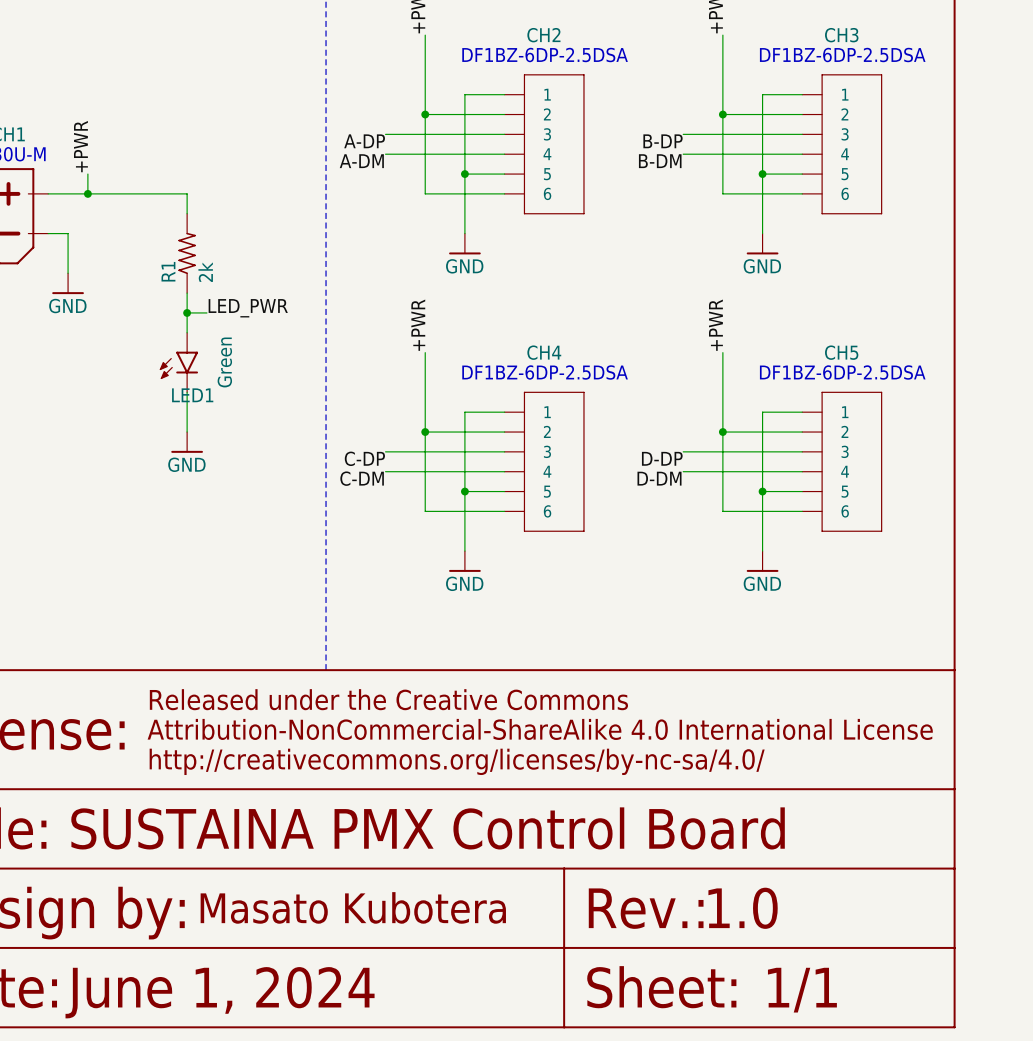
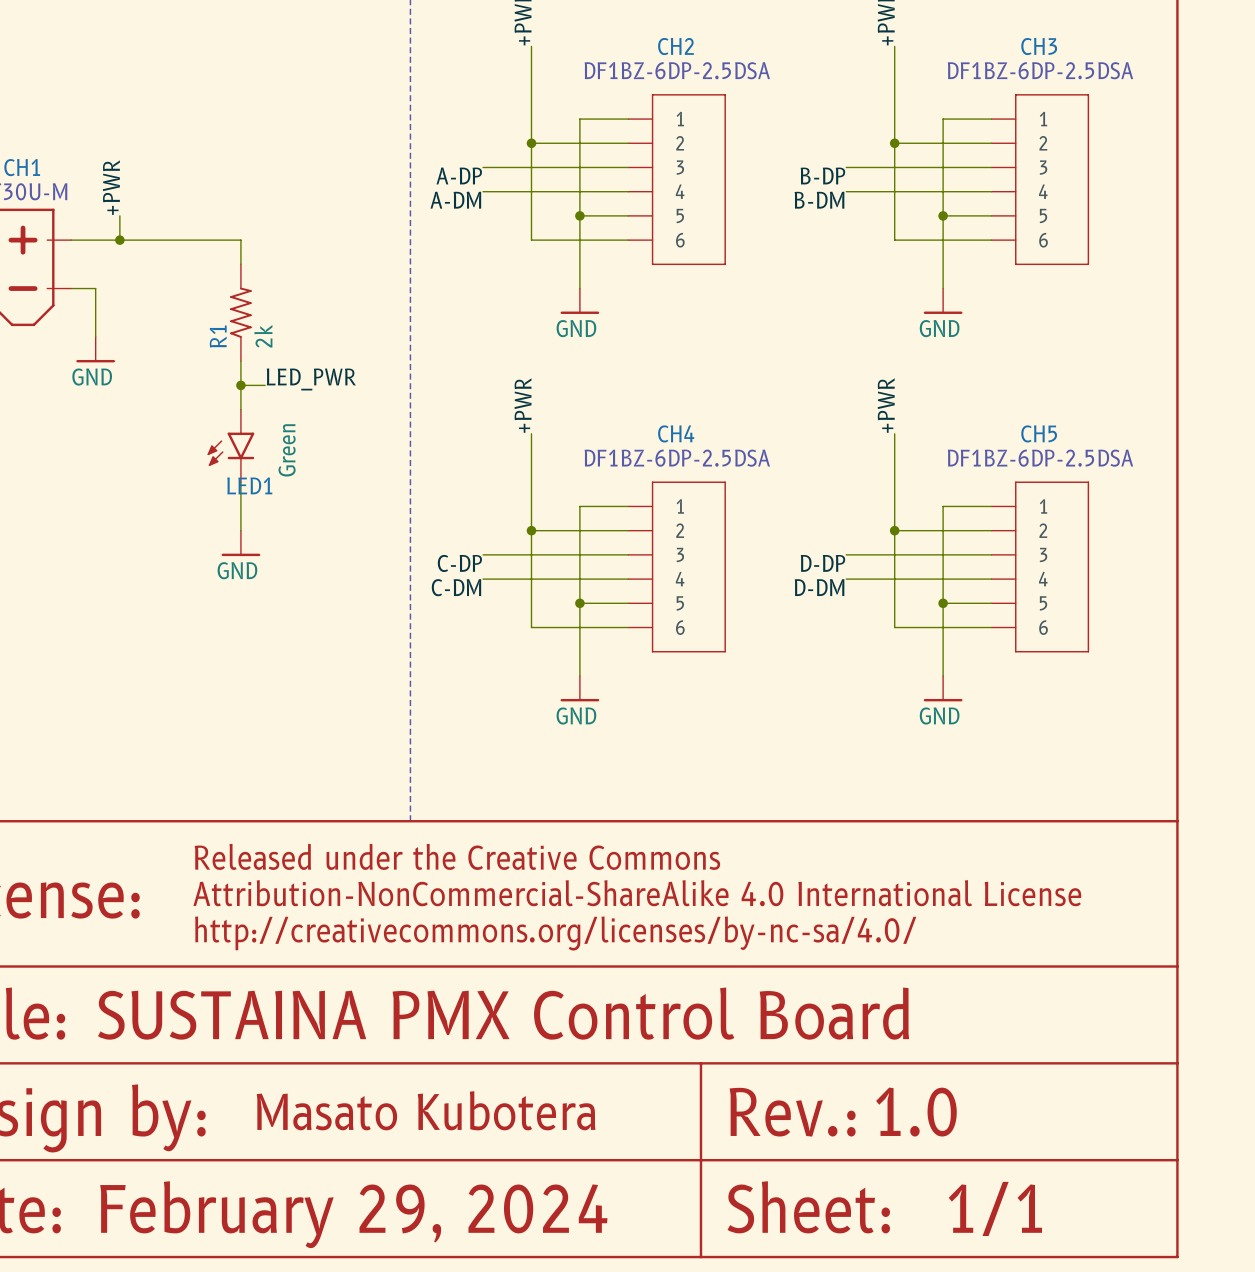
text: June 1, 2024 (220, 992) -> February 29, 2024 (353, 1214)

